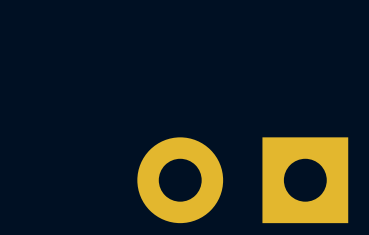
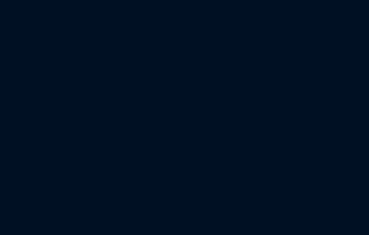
part: (242, 180) -> none

